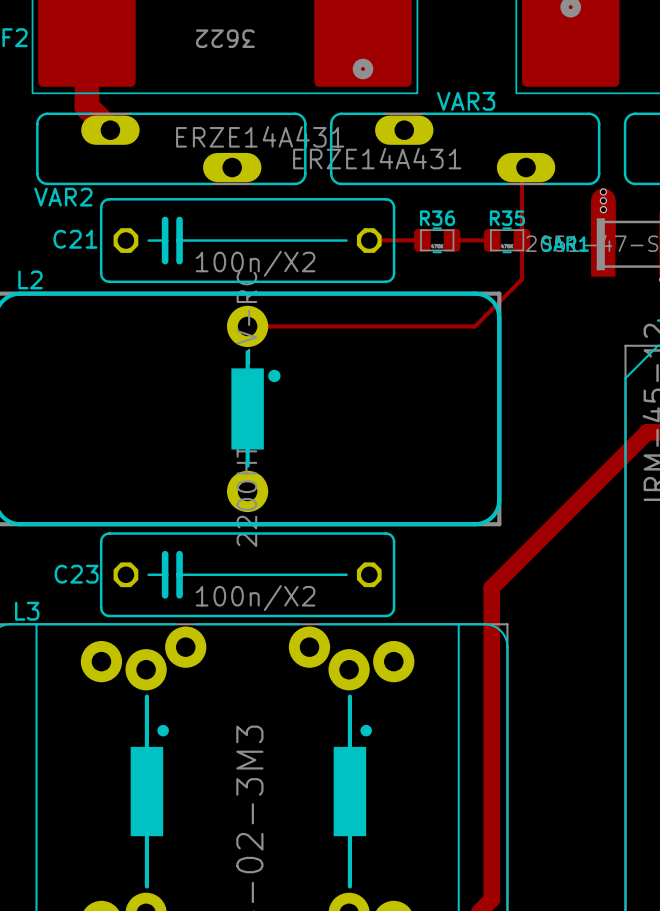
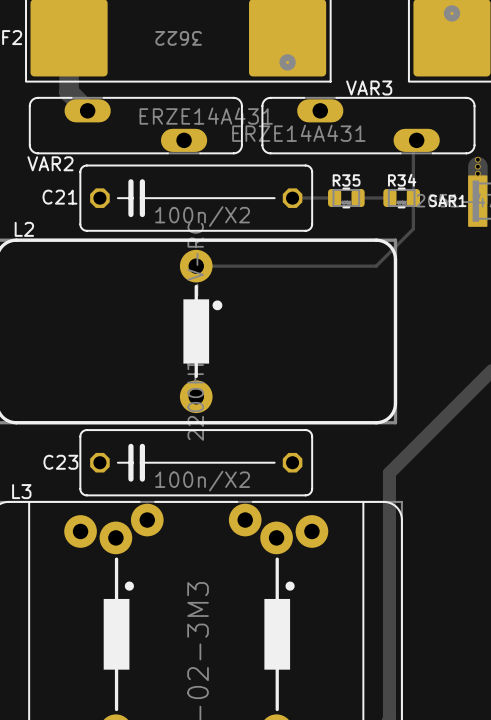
R36 name: R36 (437, 218) -> R35 (346, 180)
R35 name: R35 (507, 218) -> R34 (402, 180)

